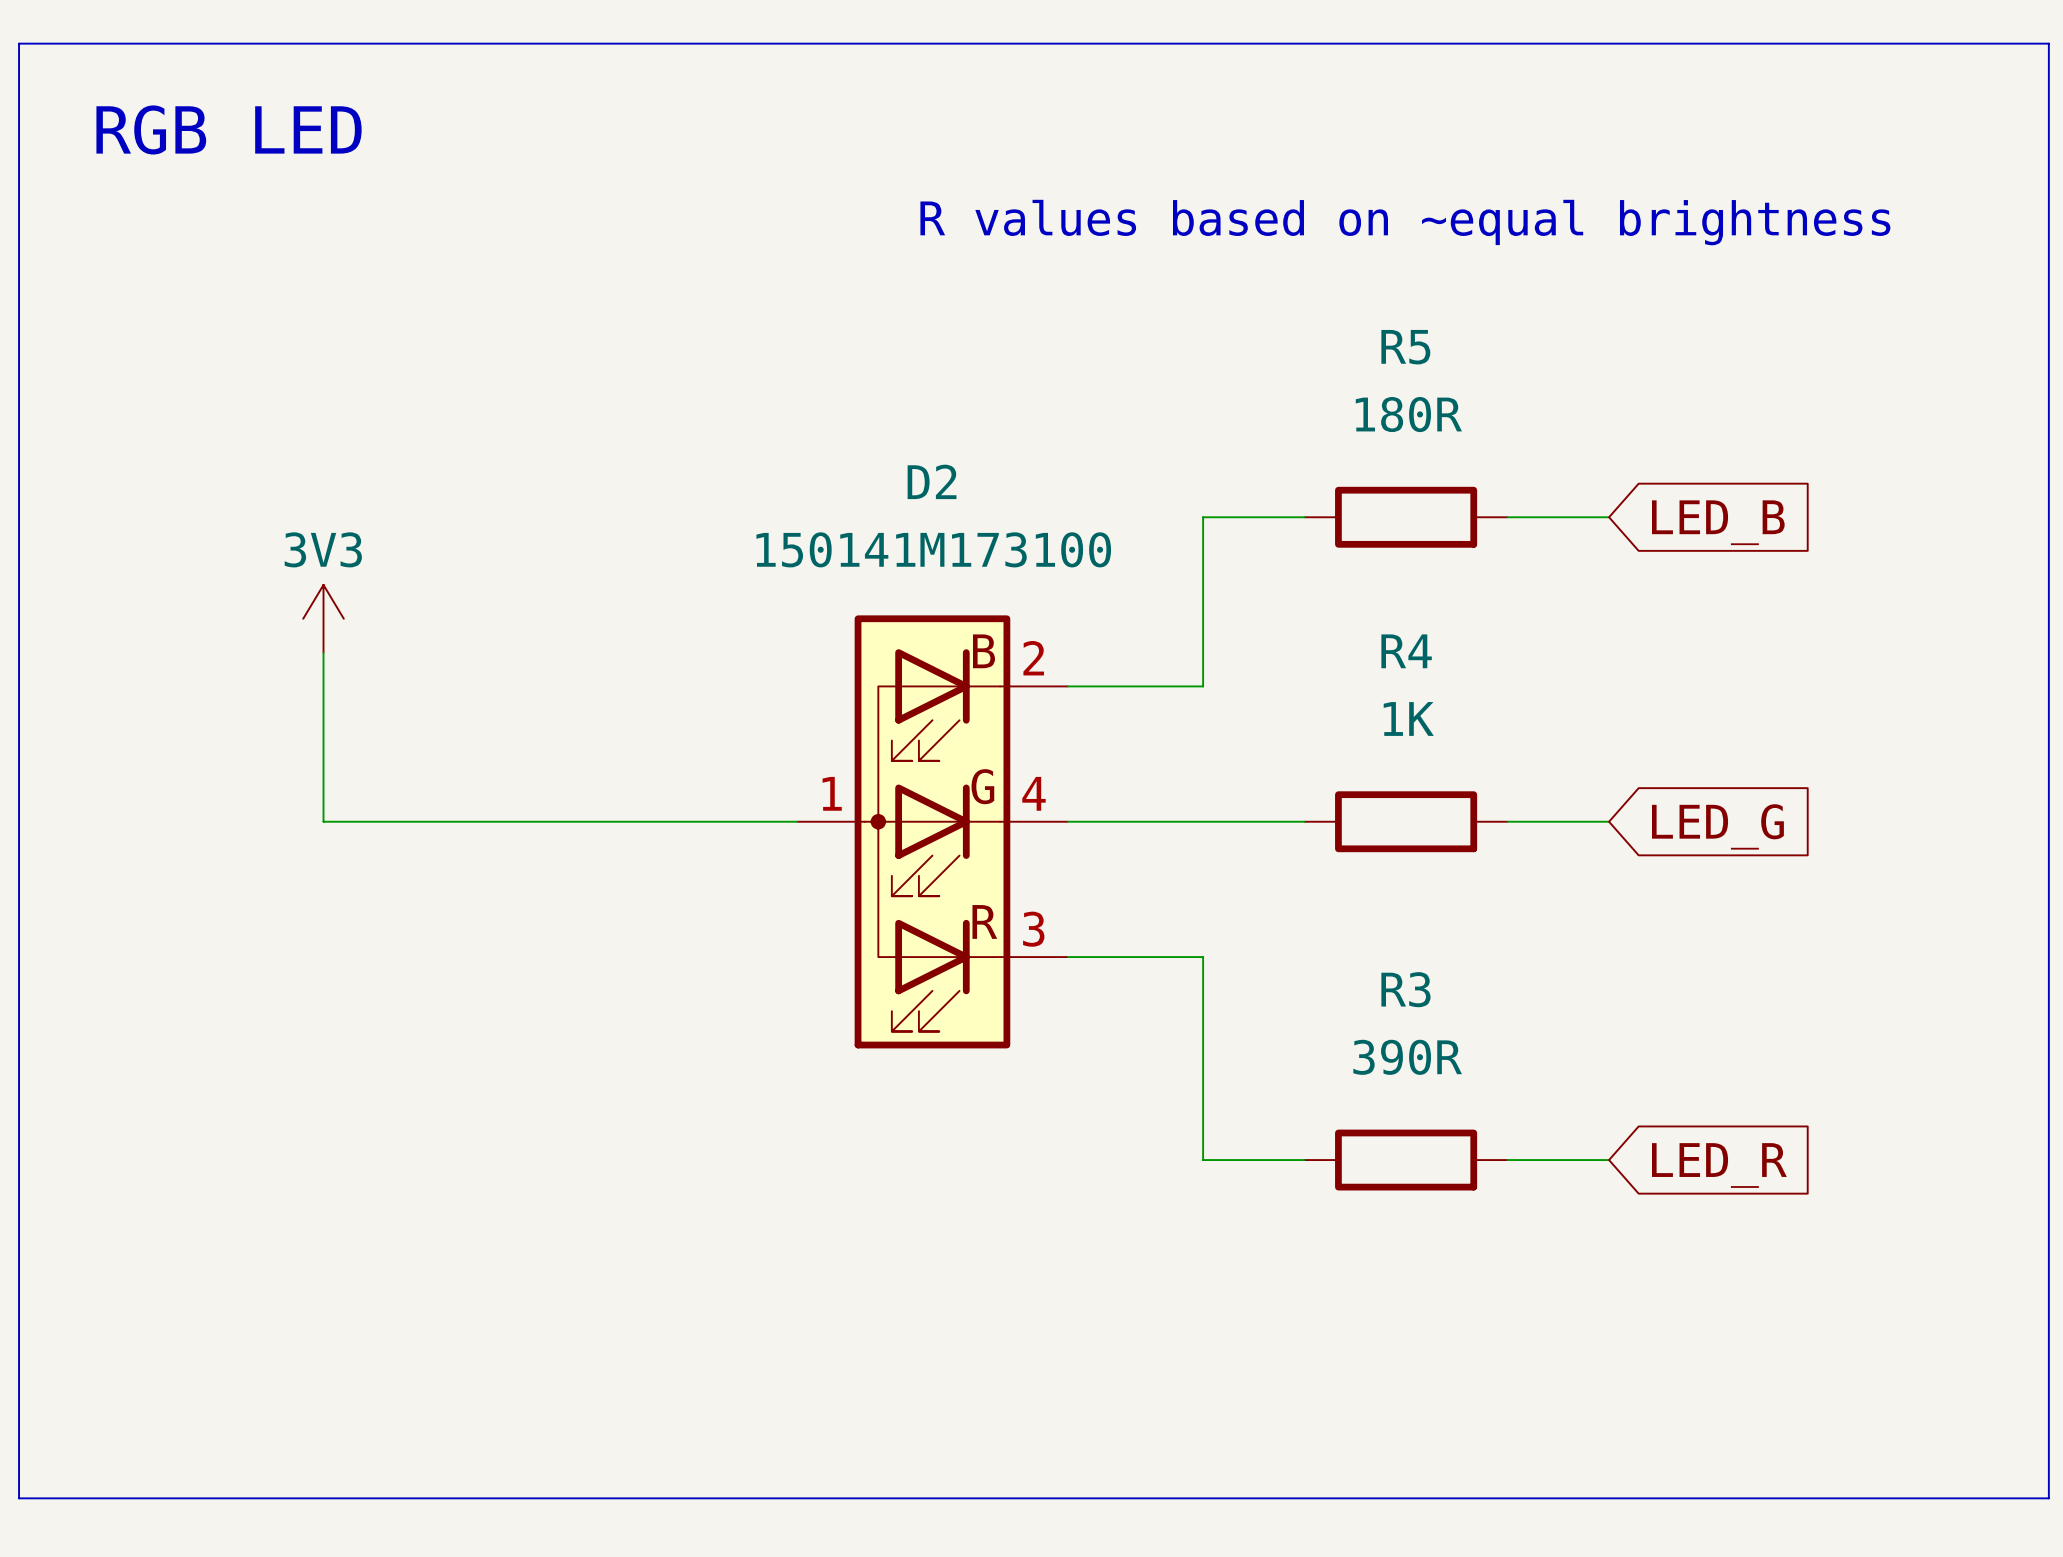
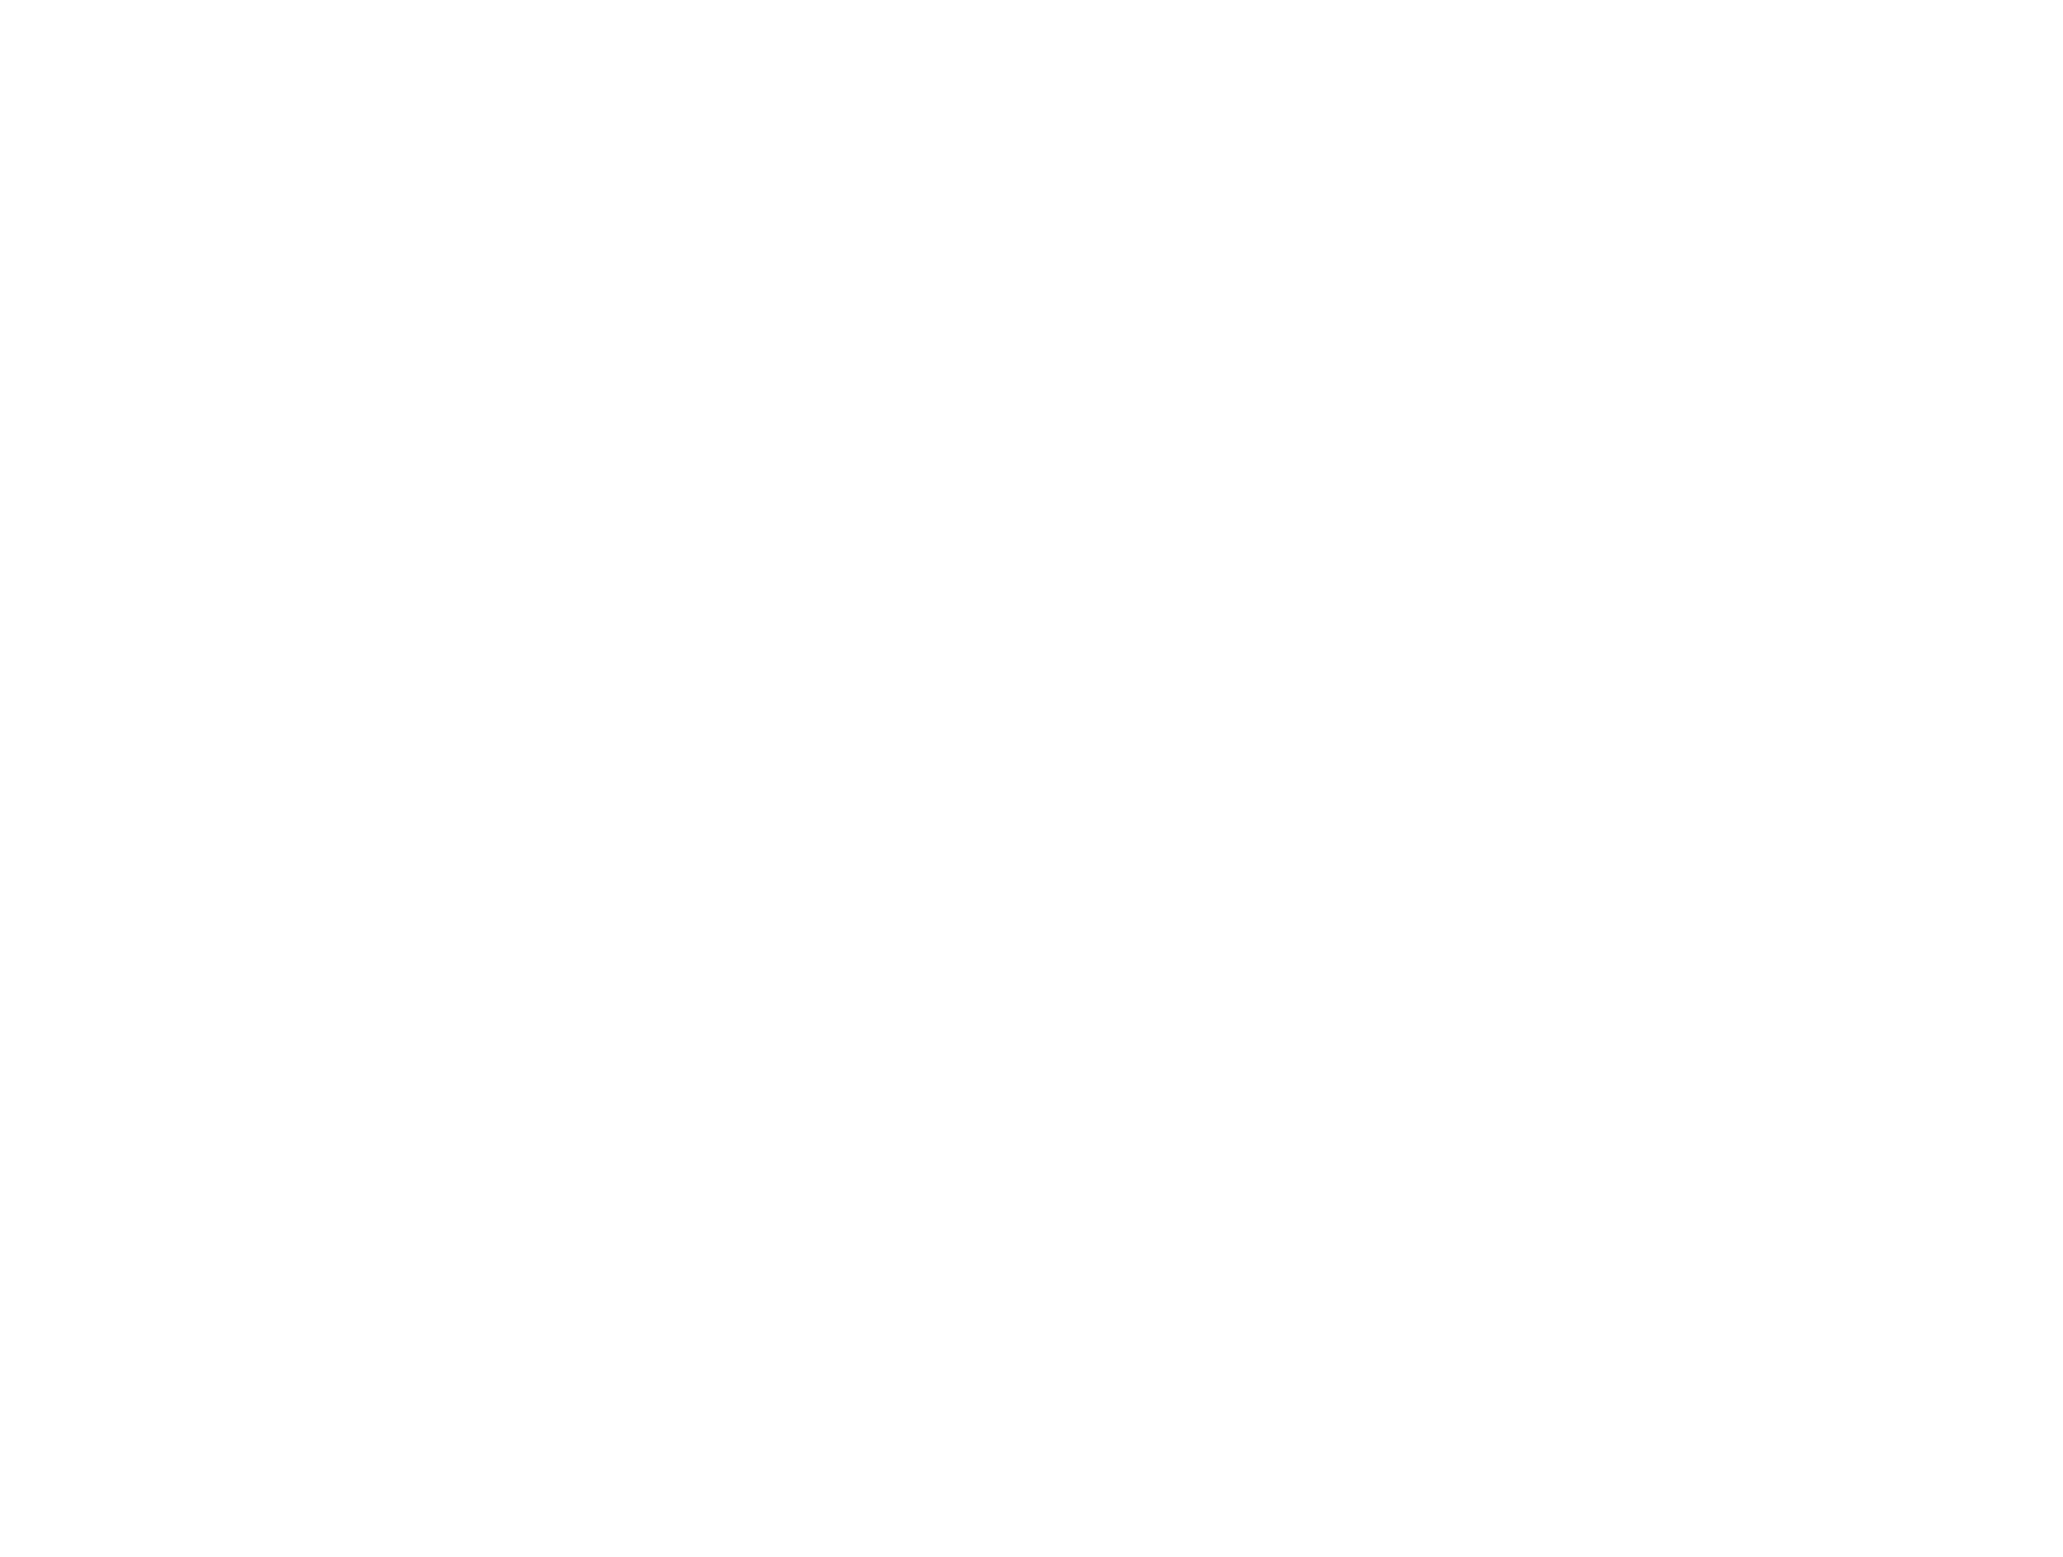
line: (19, 43) (2048, 43) (2048, 1498) (19, 1498) (19, 43) -> none
text: RGB LED (229, 129) -> none
text: R values based on ~equal brightness (1405, 222) -> none
wire: (1304, 517) (1203, 517) (1203, 686) (1067, 686) -> none
R5: 180R (1406, 517) -> none
wire: (1507, 517) (1609, 517) -> none
global label: LED_B (1718, 522) -> none
power symbol: 3V3 (323, 618) -> none
wire: (323, 652) (323, 821) (797, 821) -> none
wire: (1067, 821) (1304, 821) -> none
R4: 1K (1406, 821) -> none
wire: (1507, 821) (1609, 821) -> none
global label: LED_G (1717, 826) -> none
D2: 150141M173100 (932, 831) -> none
wire: (1067, 957) (1203, 957) (1203, 1160) (1304, 1160) -> none
R3: 390R (1406, 1160) -> none
wire: (1507, 1160) (1609, 1160) -> none
global label: LED_R (1719, 1165) -> none

